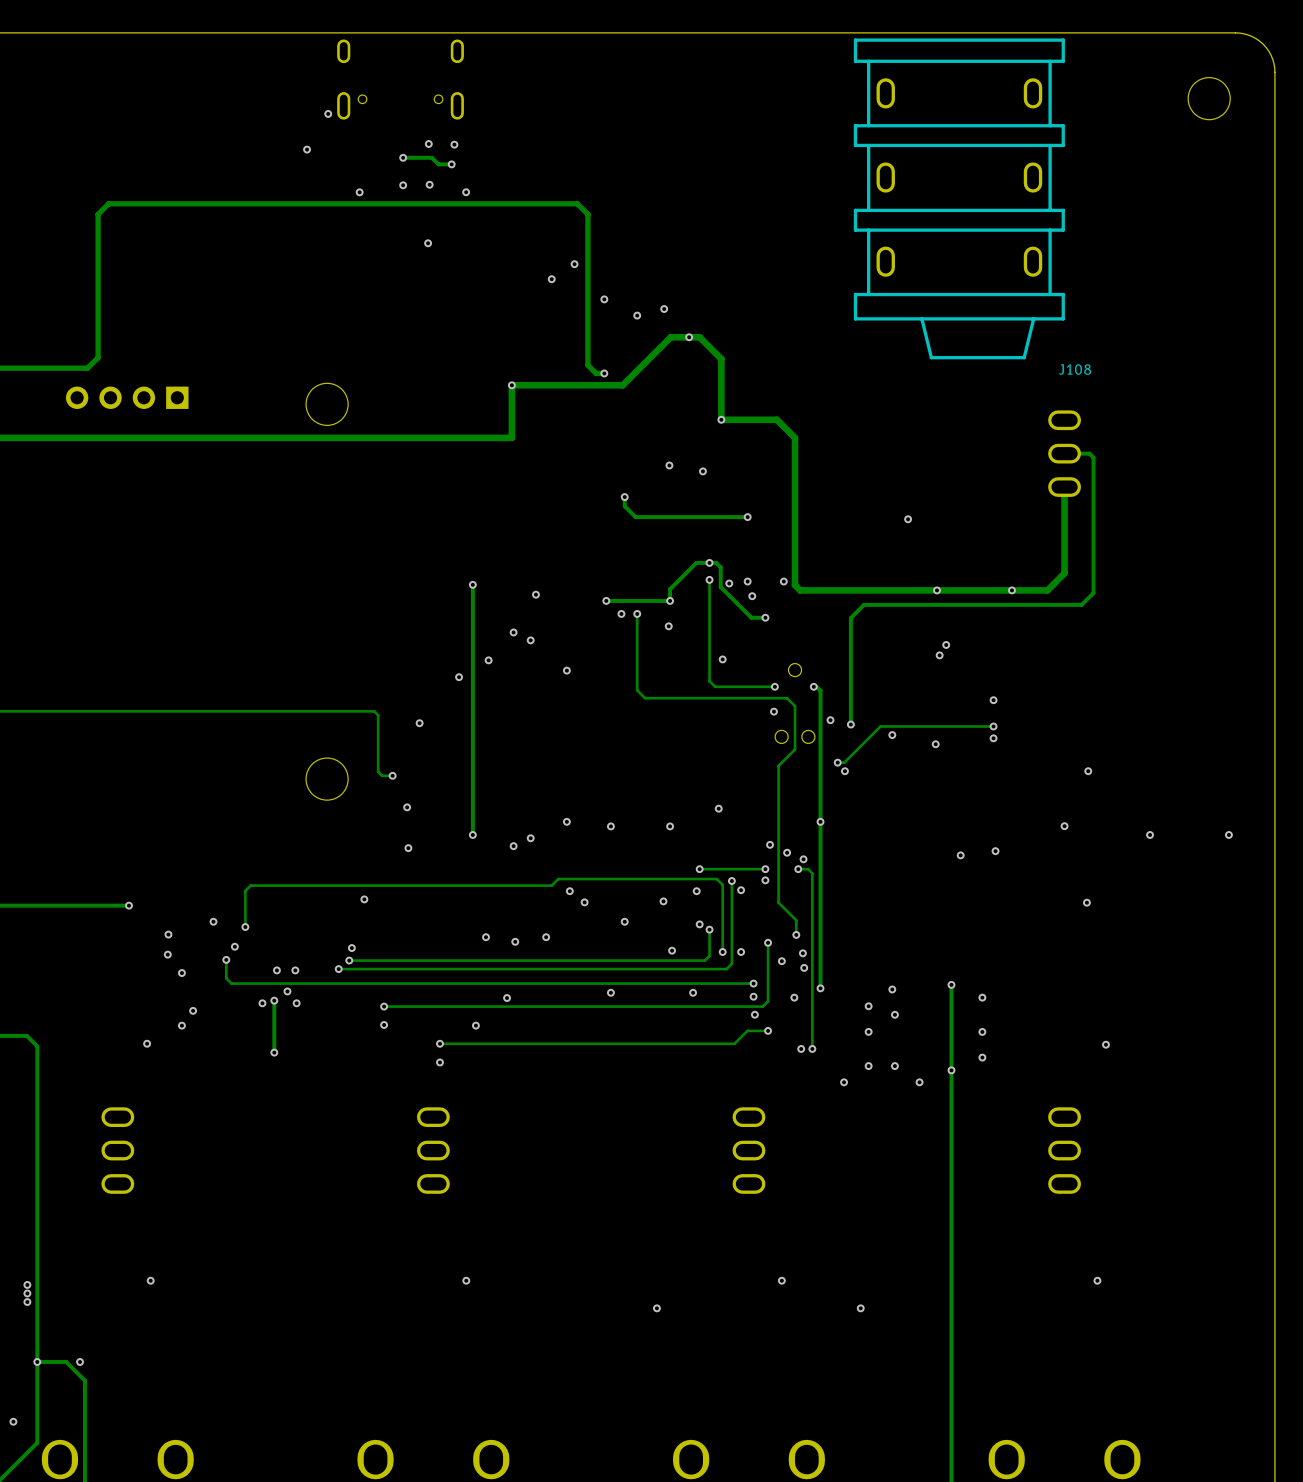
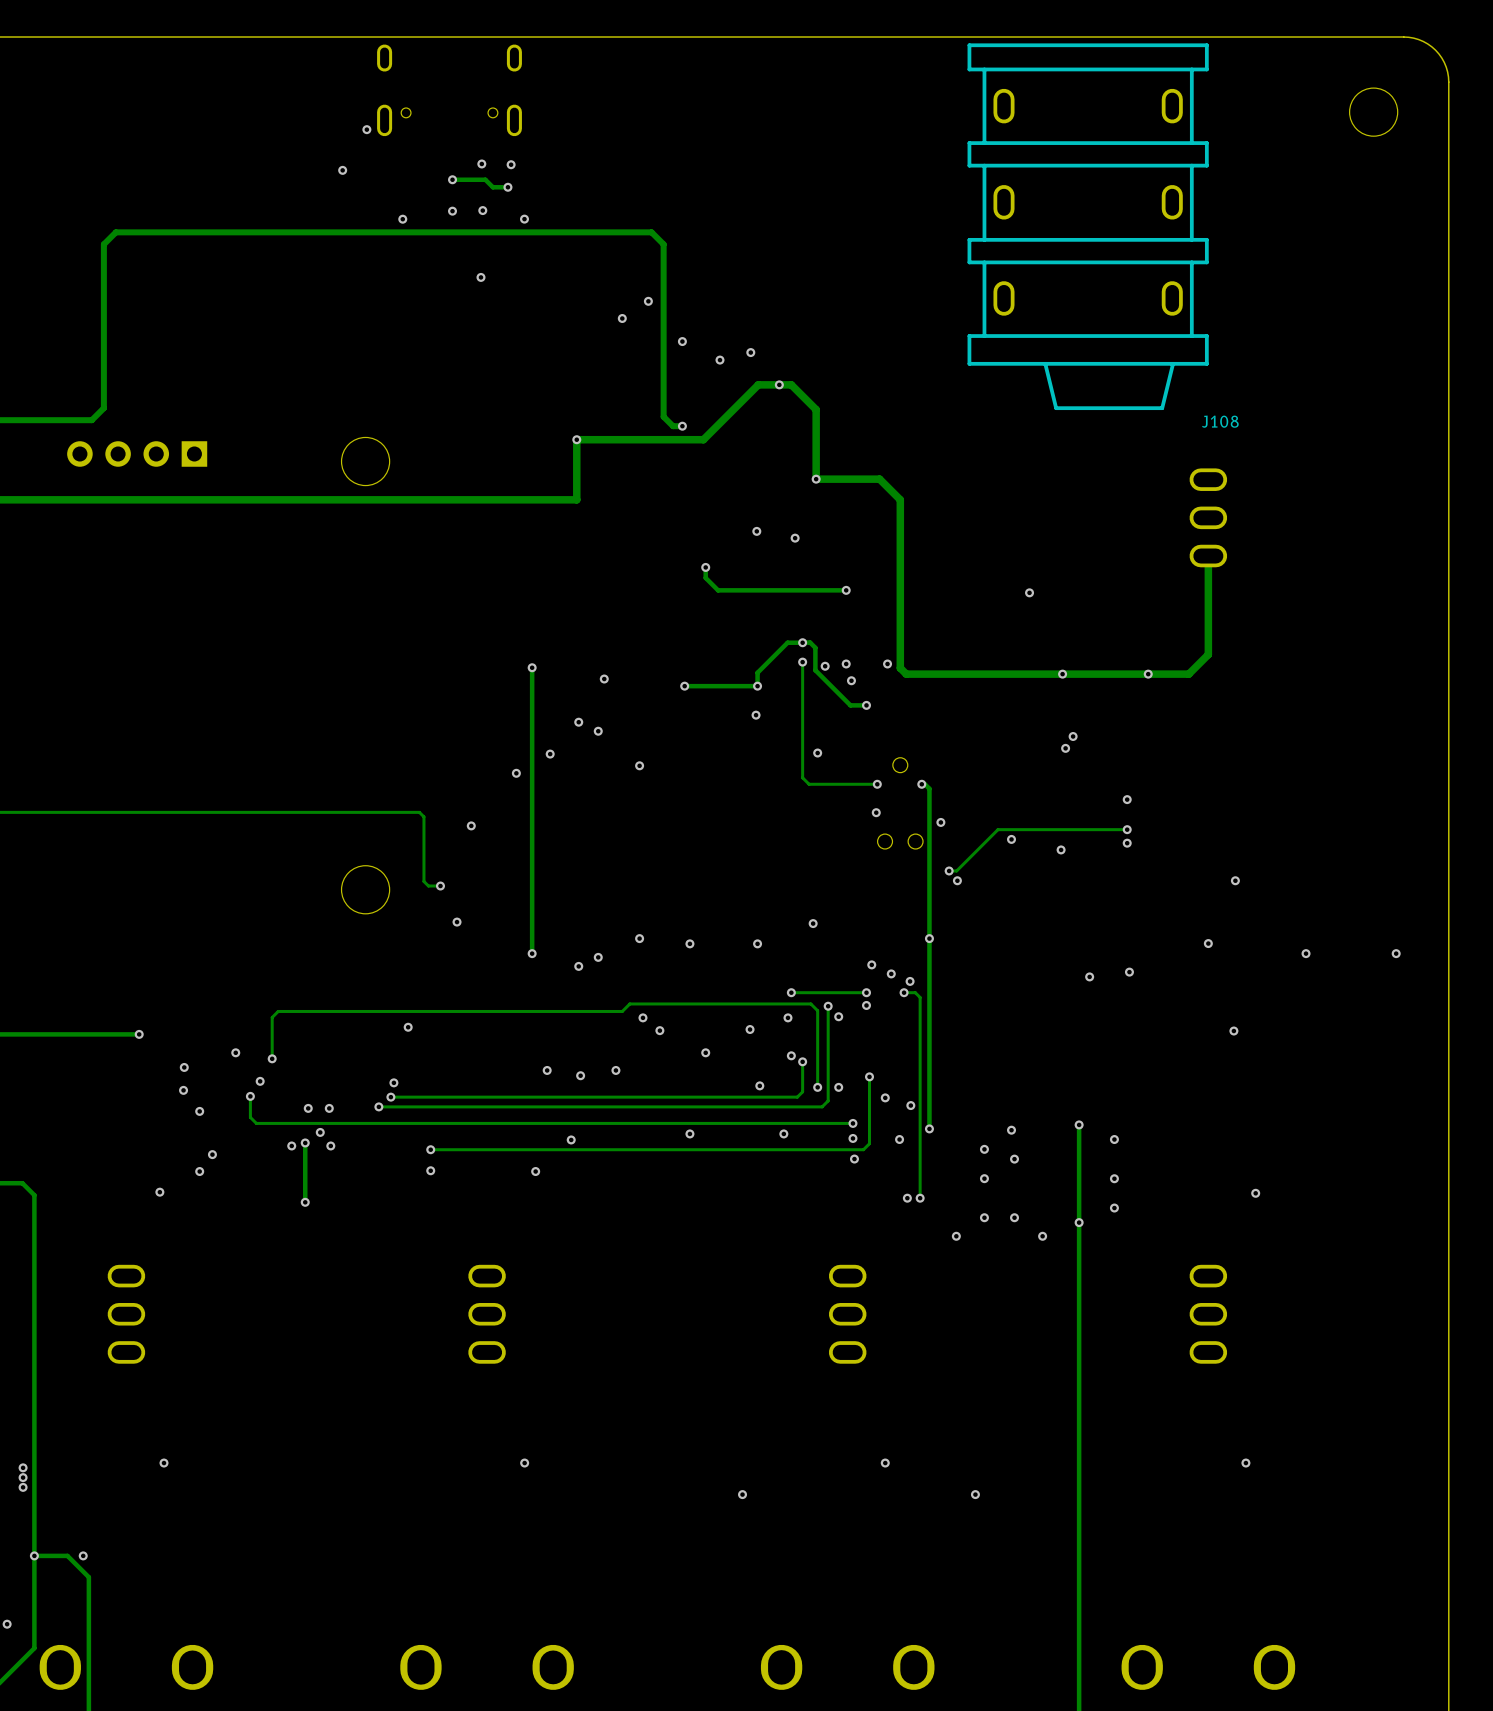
track: (1064, 453) (1089, 453) (1093, 457) (1093, 593) (1081, 604) (864, 604) (850, 618) (850, 724) -> none
via: (621, 613) -> none
track: (637, 613) (637, 690) (645, 698) (787, 698) (795, 706) (795, 749) (778, 765) (778, 902) (796, 920) (796, 934) -> none
via: (637, 613) -> none
via: (850, 724) -> none
via: (408, 848) -> none
via: (796, 934) -> none
via: (802, 953) -> none
track: (768, 1030) (747, 1030) (734, 1043) (439, 1043) -> none
via: (768, 1030) -> none
via: (439, 1043) -> none
via: (439, 1062) -> none

